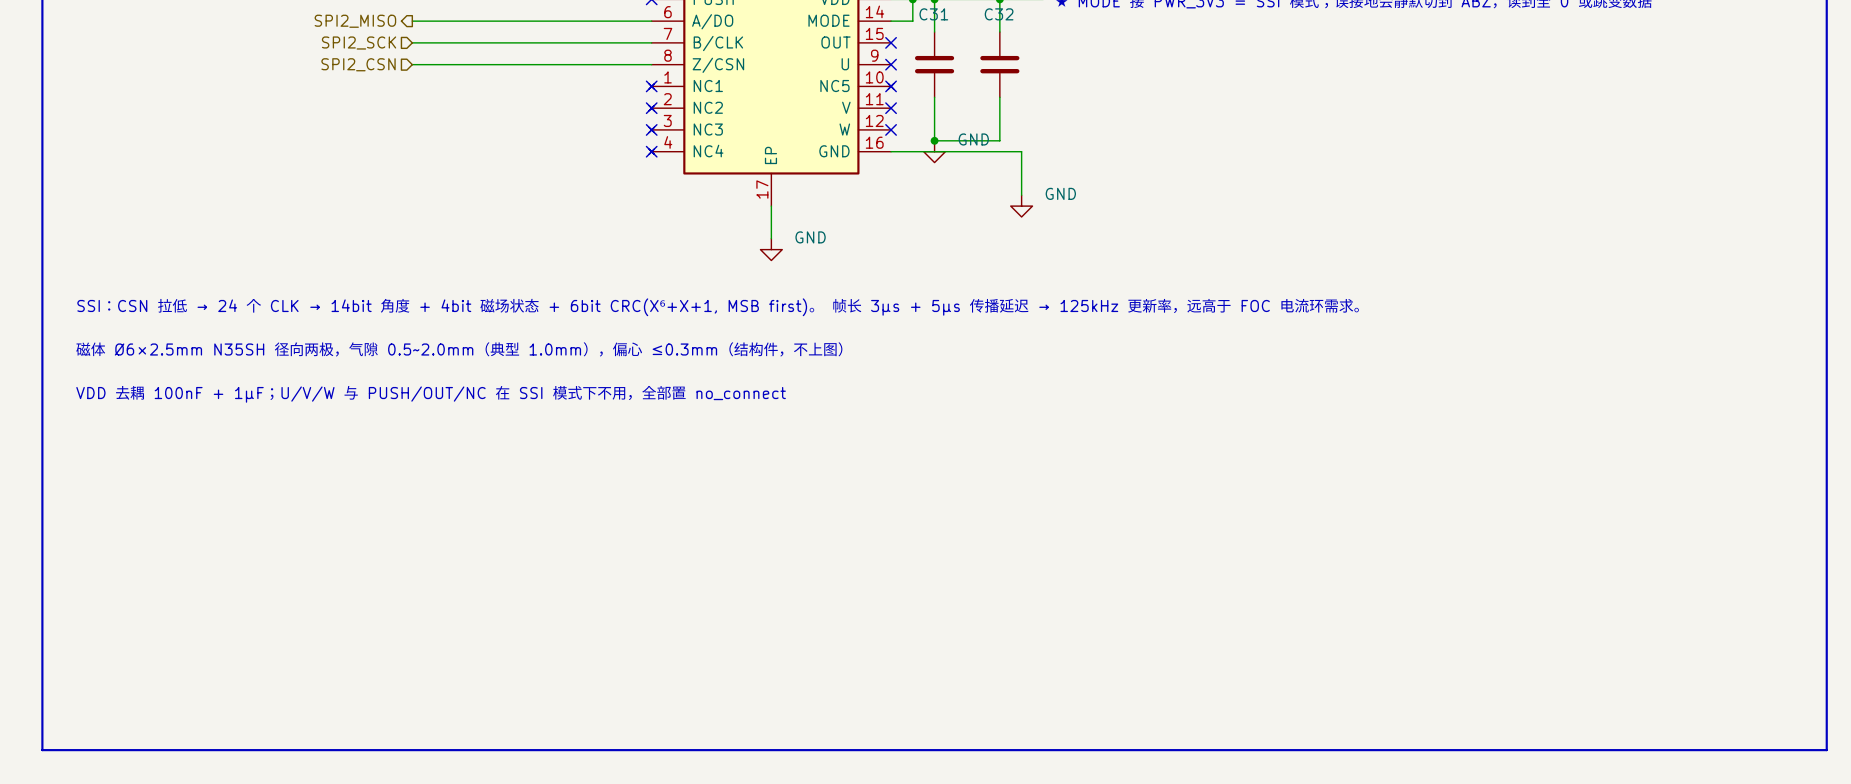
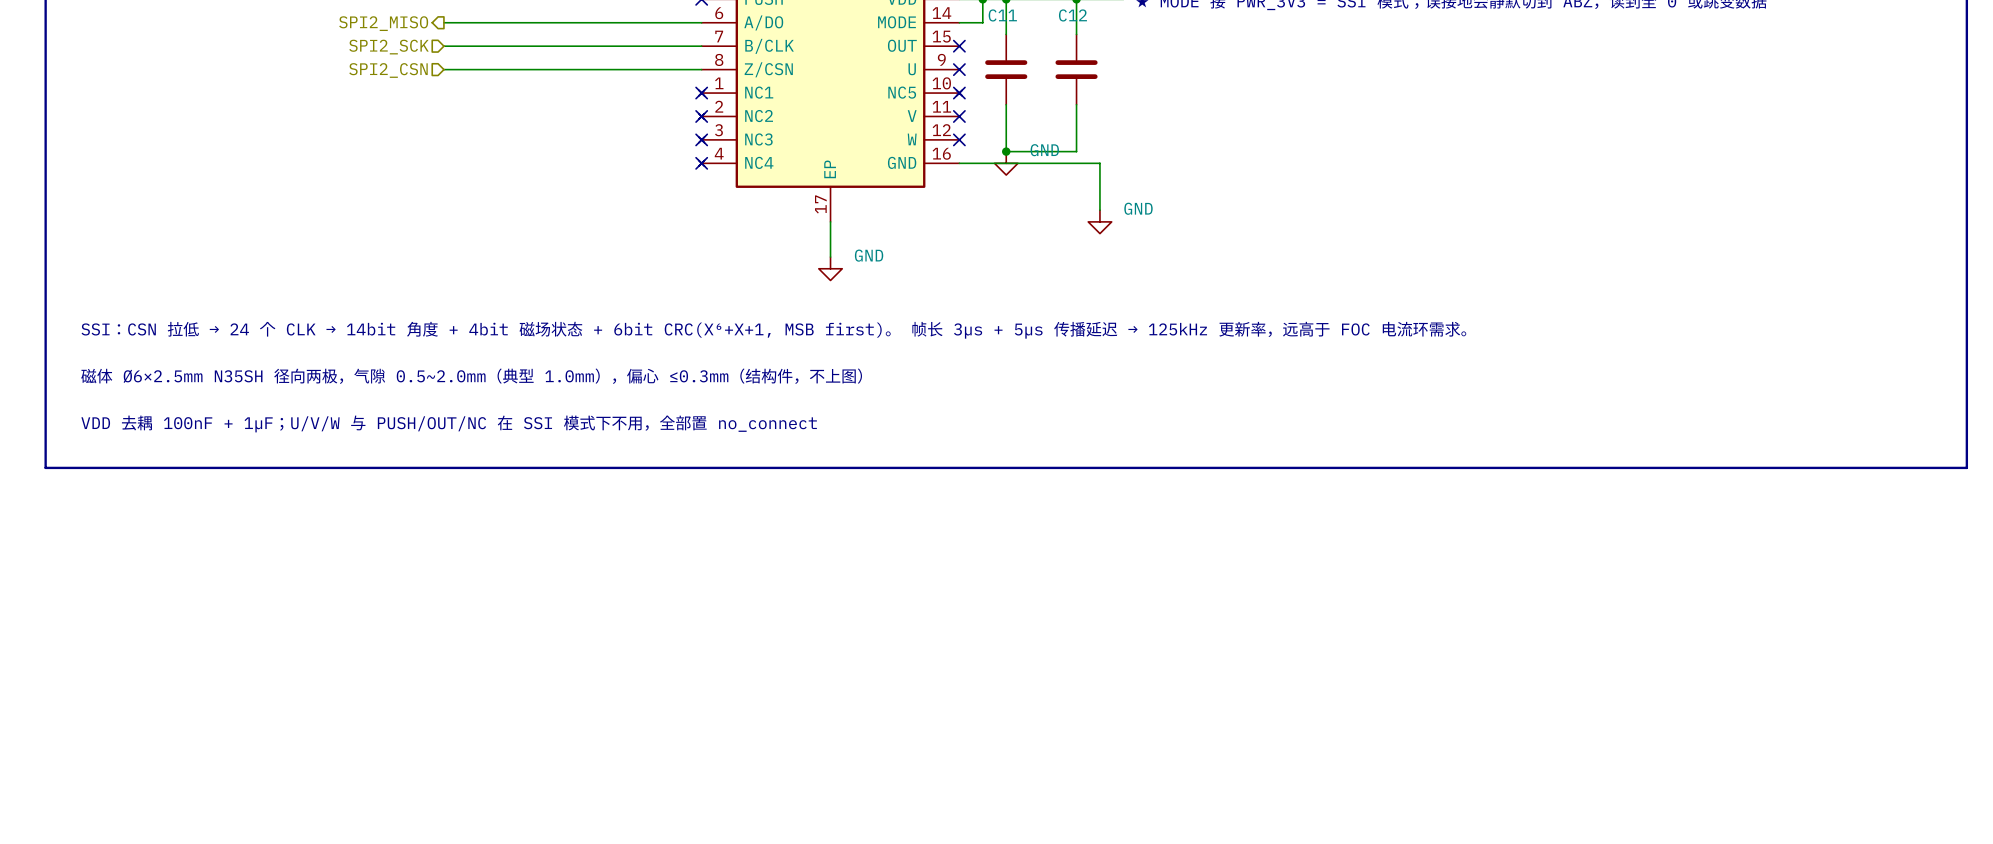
C31 name: C31 (933, 14) -> C11 (1002, 15)
C32 name: C32 (999, 14) -> C12 (1072, 15)
line: (42, 434) (42, 750) (1826, 750) (1826, 434) -> (45, 467) (1966, 467)

